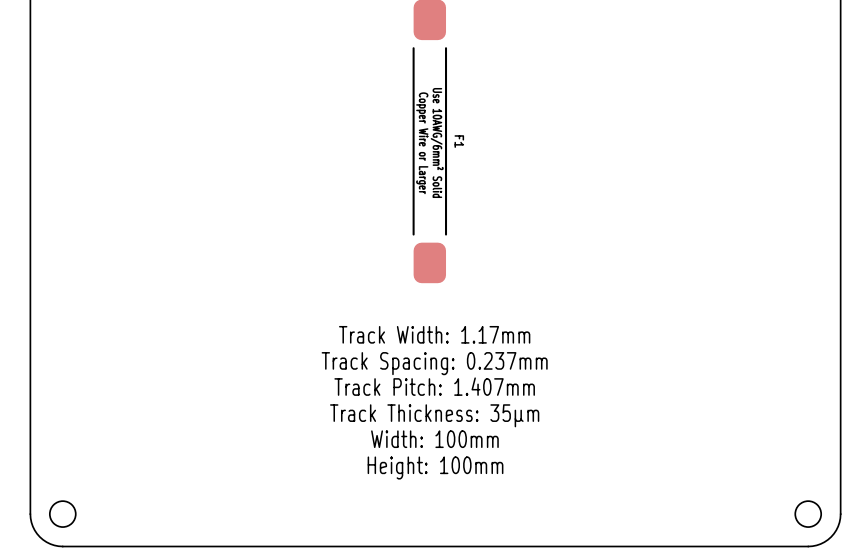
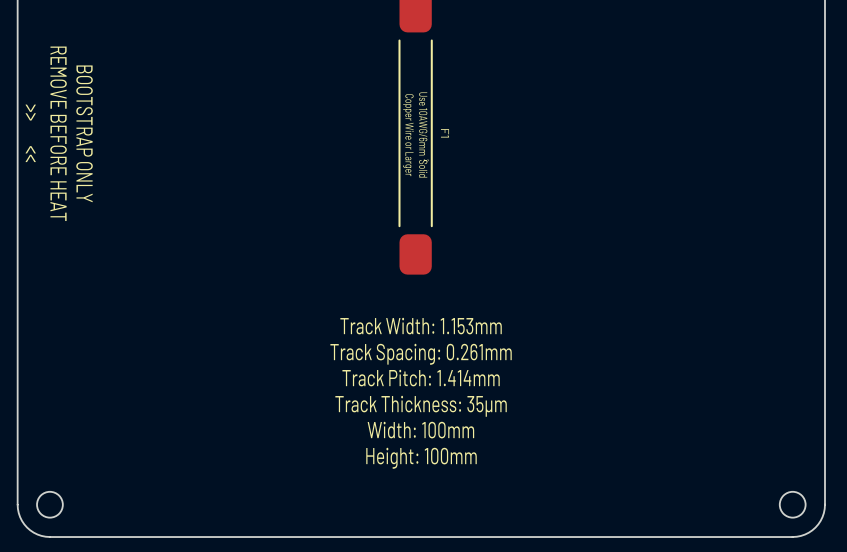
text: none -> >> << (30, 133)
text: none -> REMOVE BEFORE HEAT (58, 133)
text: none -> BOOTSTRAP ONLY (84, 133)
text: Track Width: 1.17mm (434, 334) -> Track Width: 1.153mm (421, 326)
text: Track Spacing: 0.237mm (434, 363) -> Track Spacing: 0.261mm (421, 354)
text: Track Pitch: 1.407mm (434, 386) -> Track Pitch: 1.414mm (421, 378)

